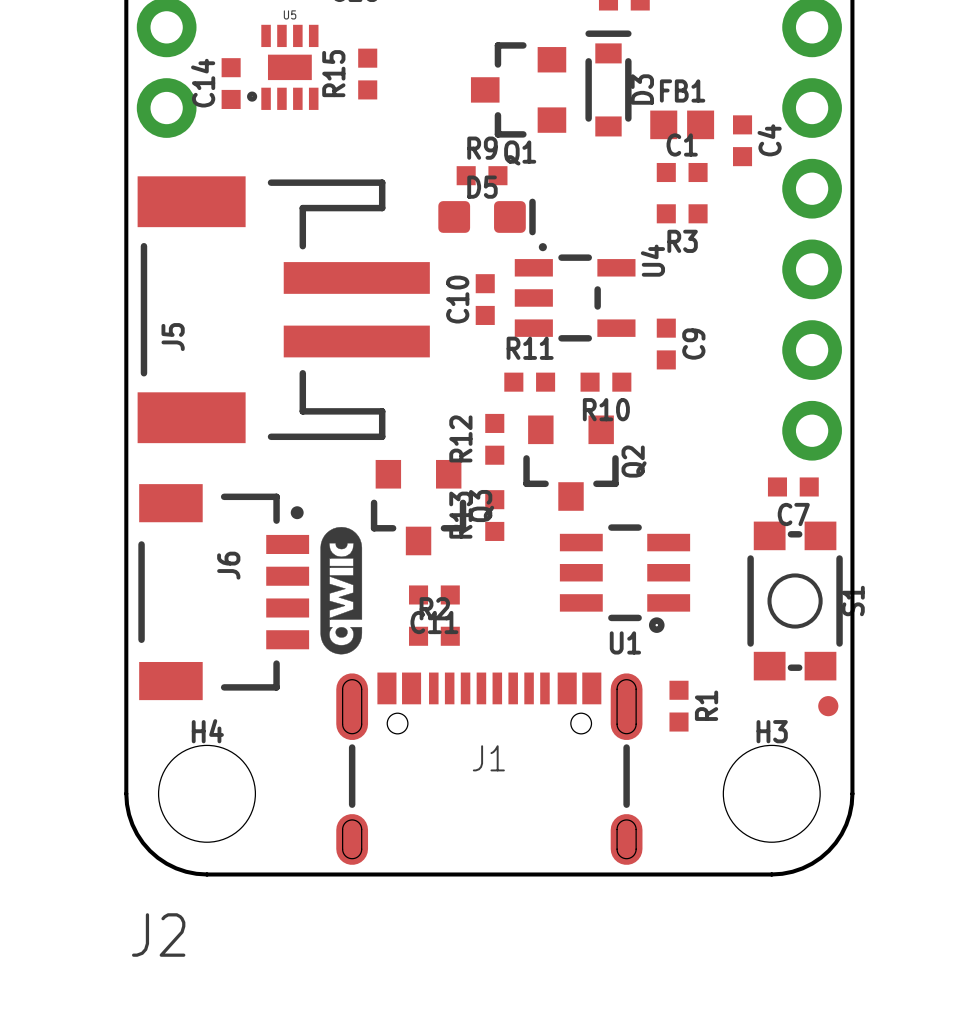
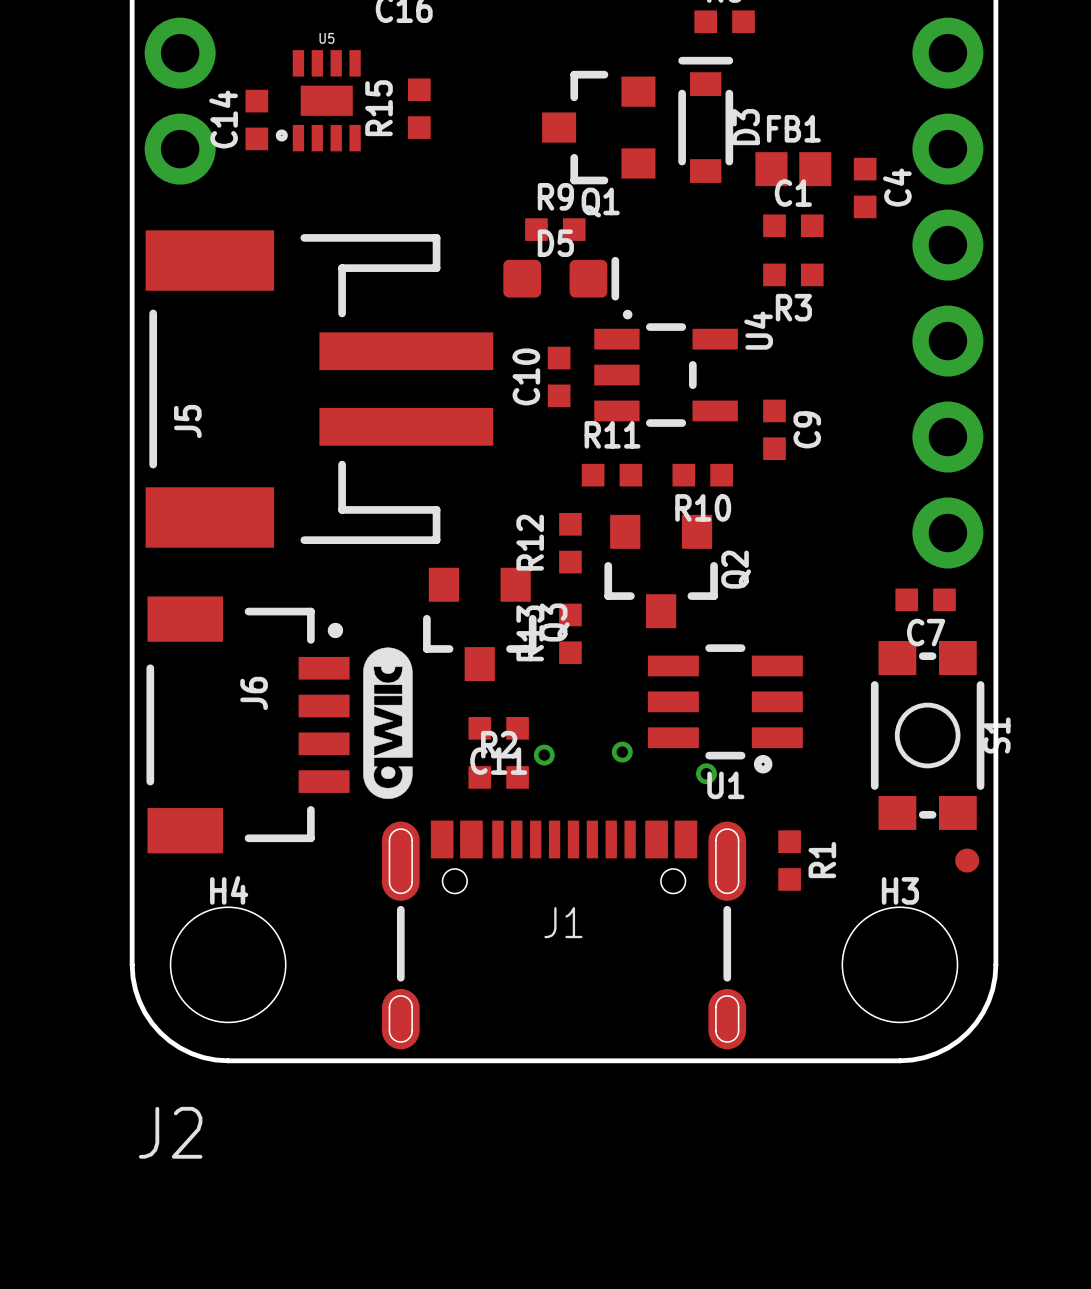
via: none -> (622, 752)
via: none -> (544, 755)
via: none -> (706, 773)

